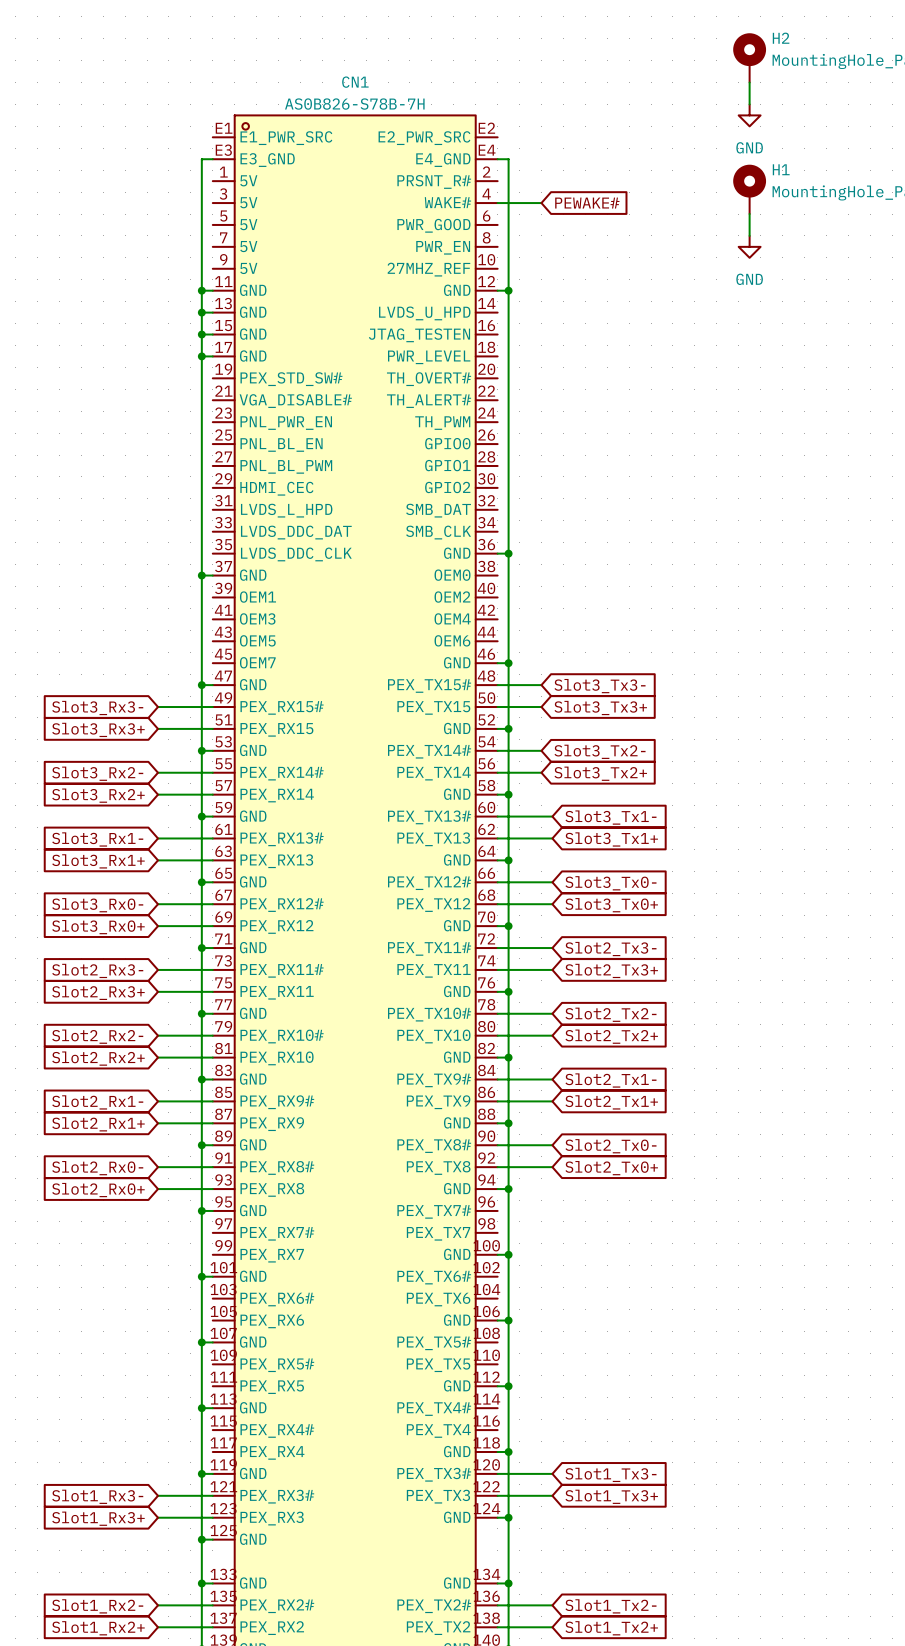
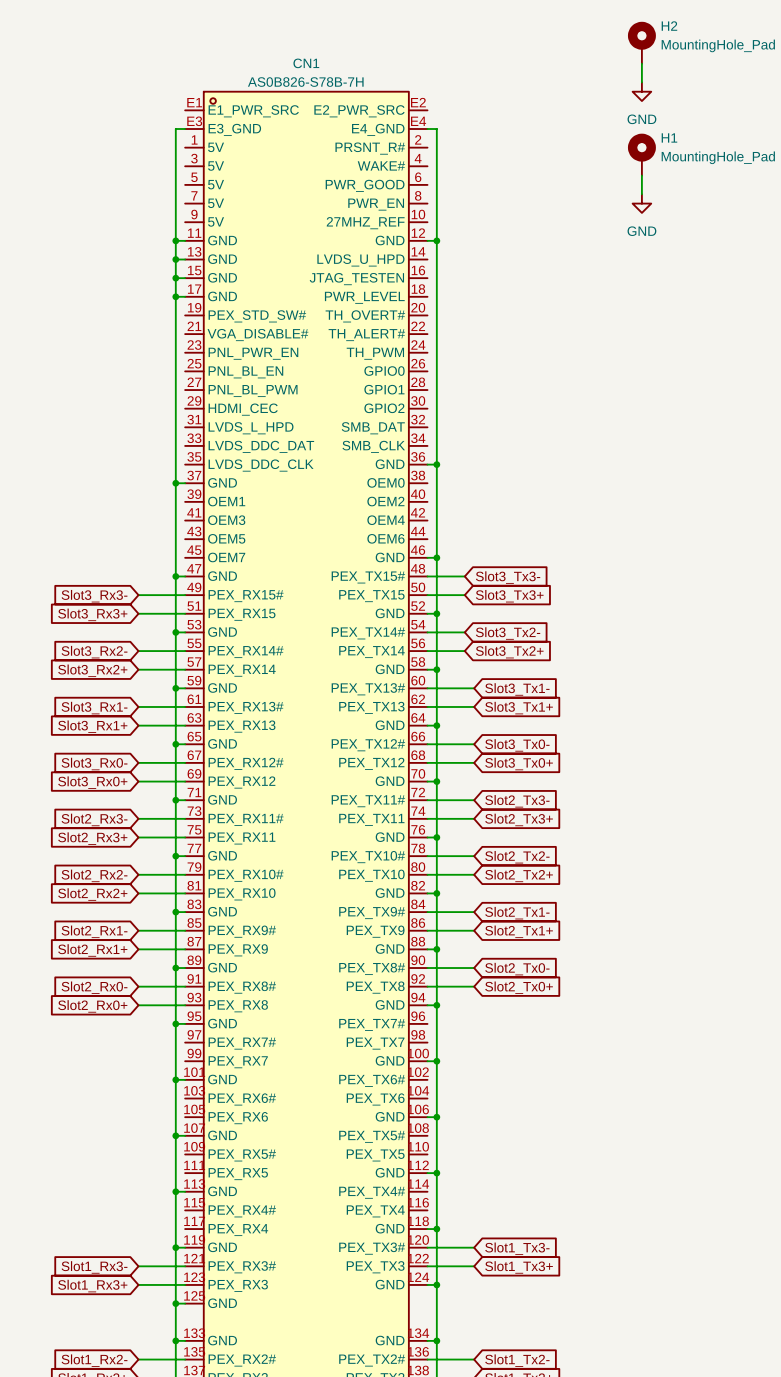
wire: (497, 203) (541, 203) -> none
global label: PEWAKE# (587, 203) -> none

